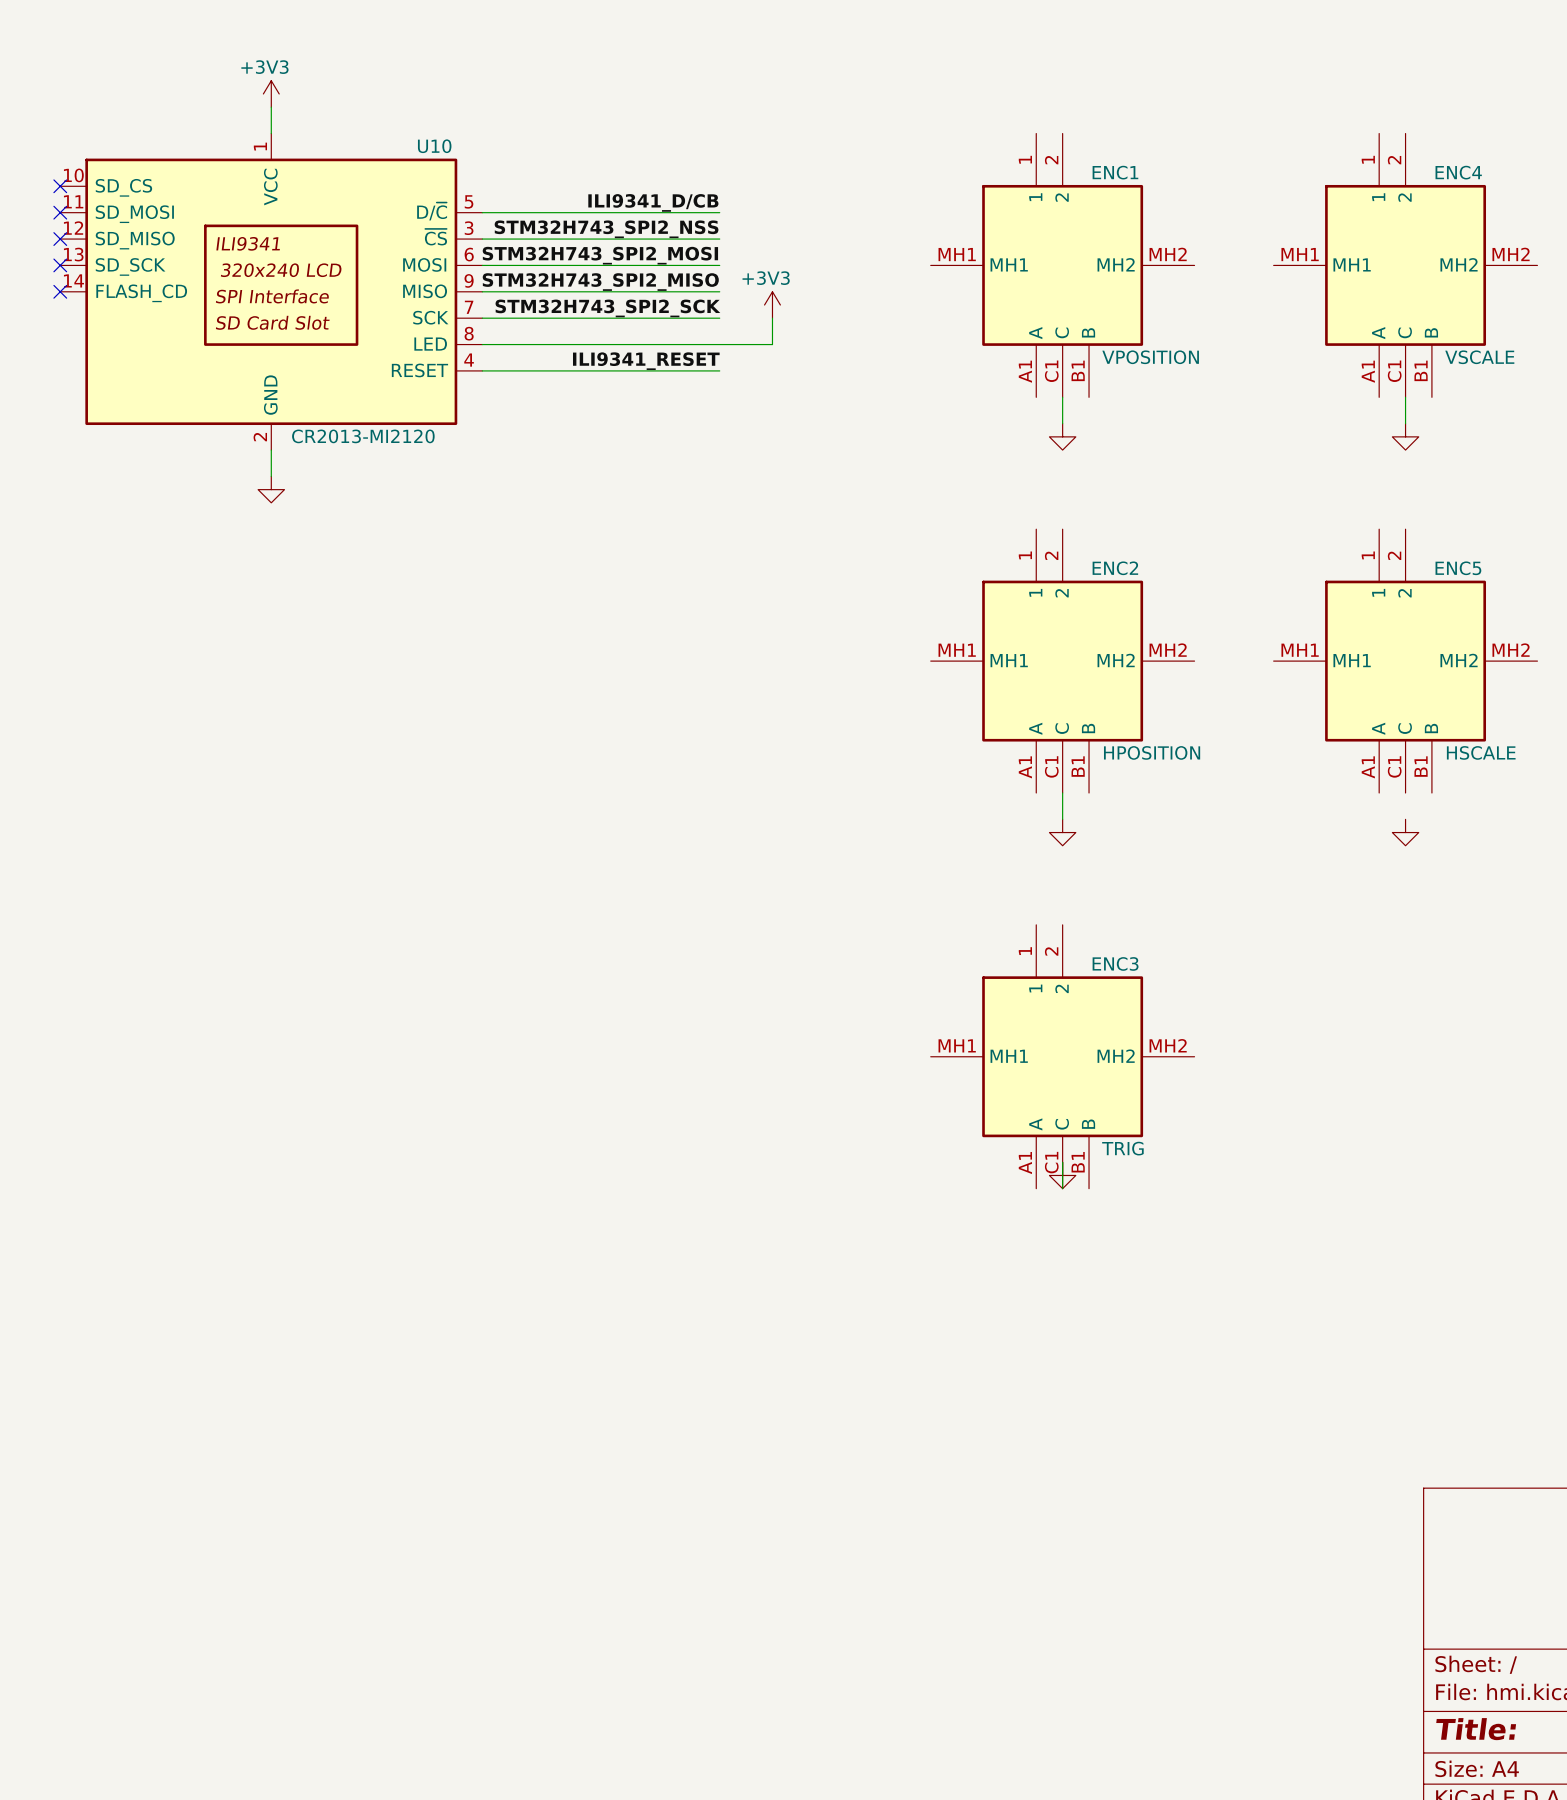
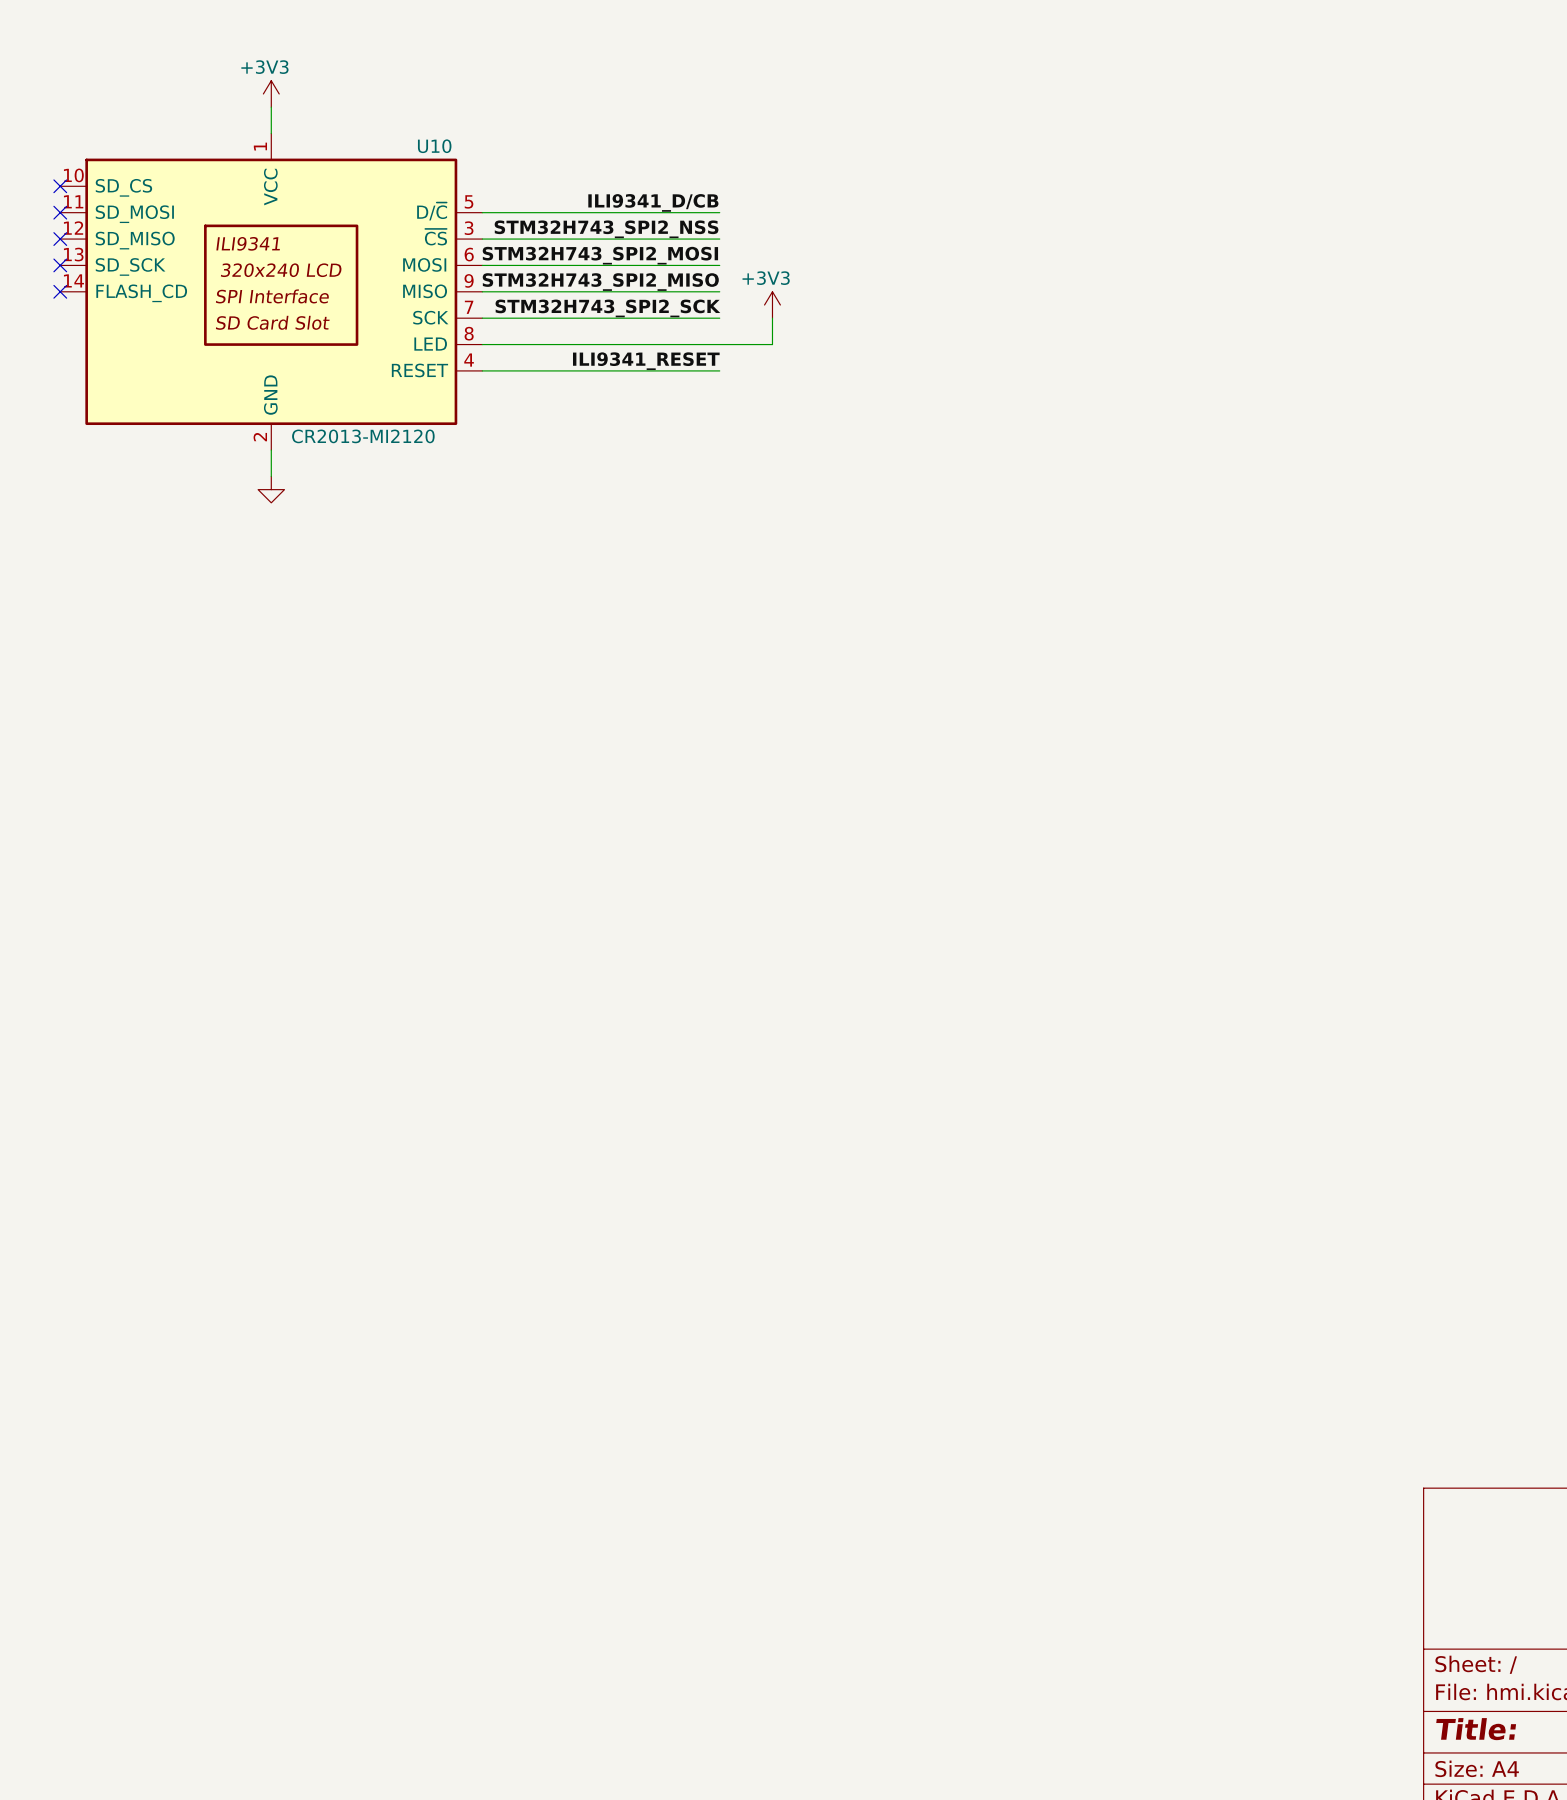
ENC1: VPOSITION (1062, 265) -> none
ENC4: VSCALE (1405, 265) -> none
wire: (1062, 397) (1062, 423) -> none
wire: (1405, 397) (1405, 423) -> none
power symbol: (1062, 436) -> none
power symbol: (1405, 436) -> none
ENC2: HPOSITION (1062, 661) -> none
ENC5: HSCALE (1405, 661) -> none
wire: (1062, 792) (1062, 819) -> none
power symbol: (1062, 832) -> none
power symbol: (1405, 832) -> none
ENC3: TRIG (1062, 1056) -> none
wire: (1062, 1162) (1062, 1188) -> none
power symbol: (1062, 1175) -> none

